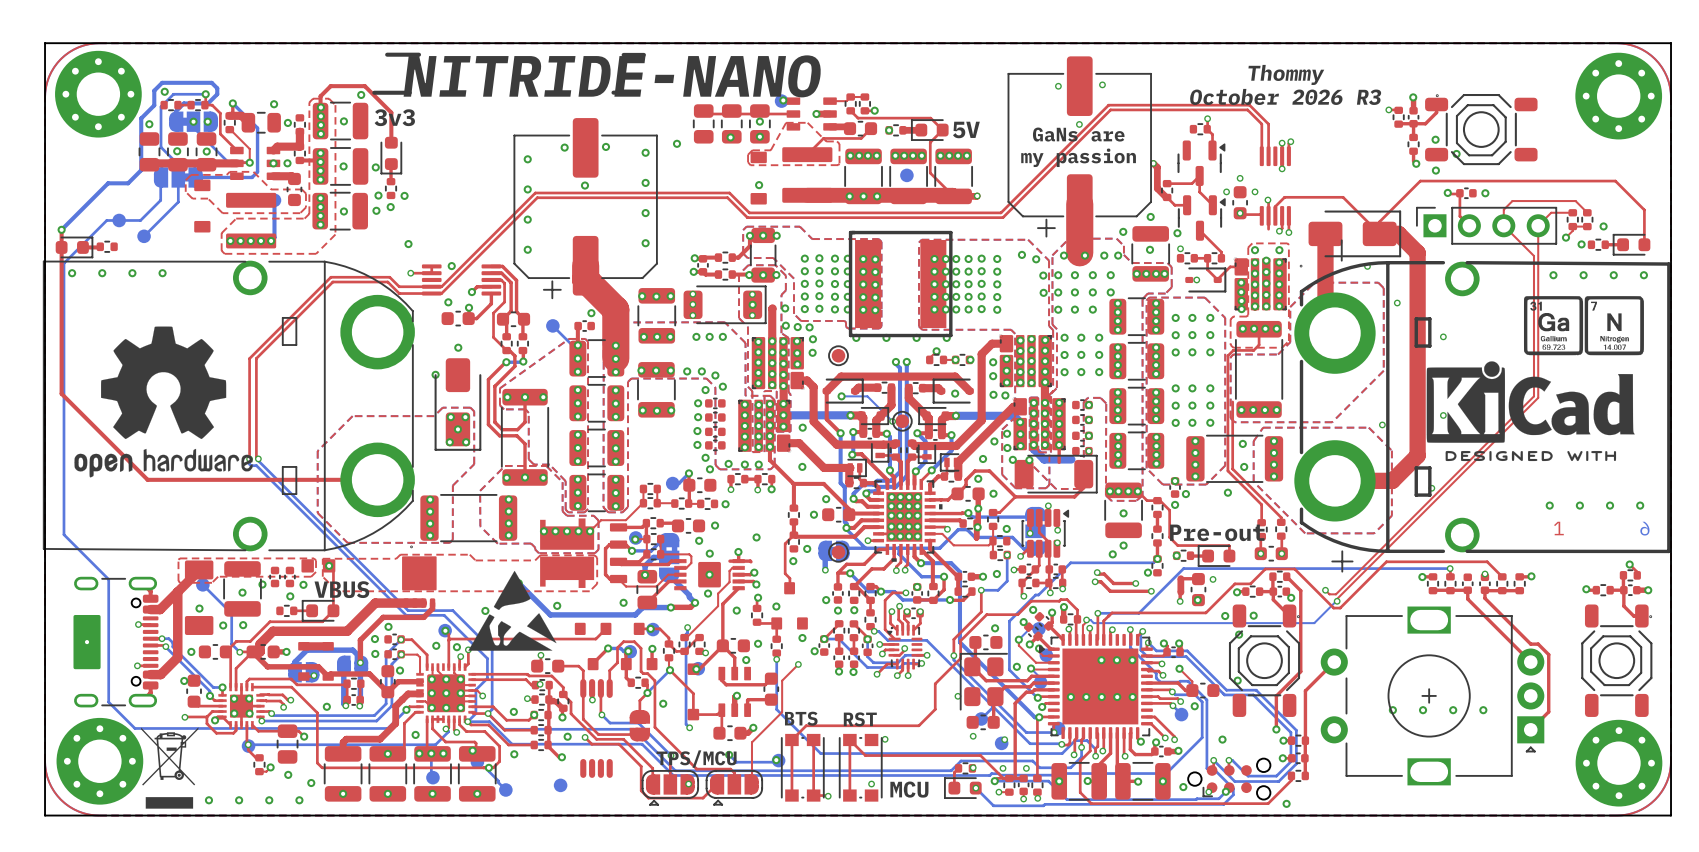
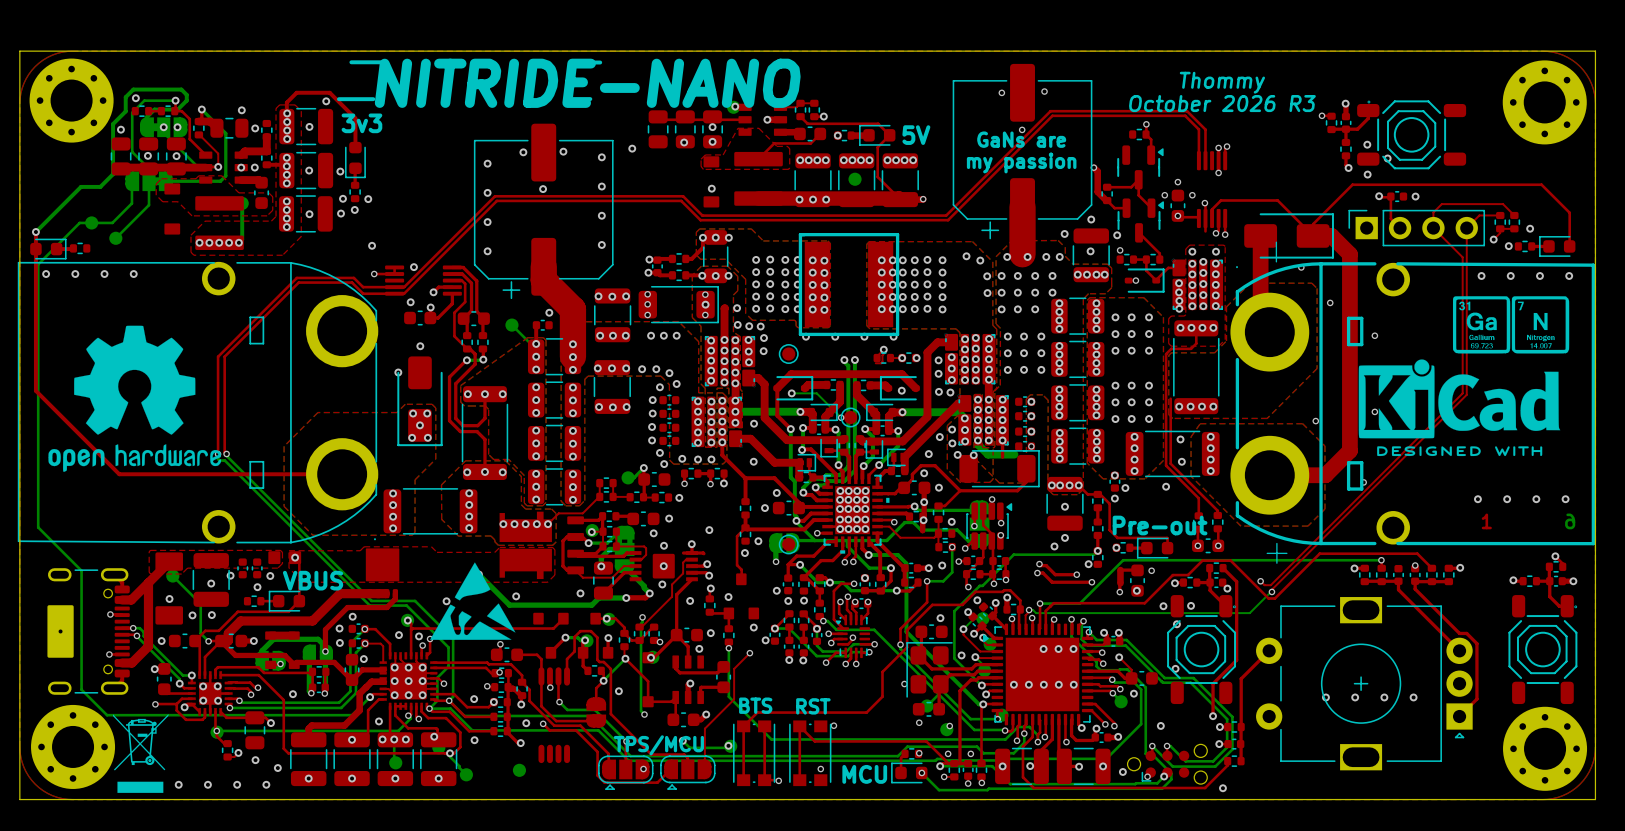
top track: none -> (883, 354) (882, 361) (875, 363)

